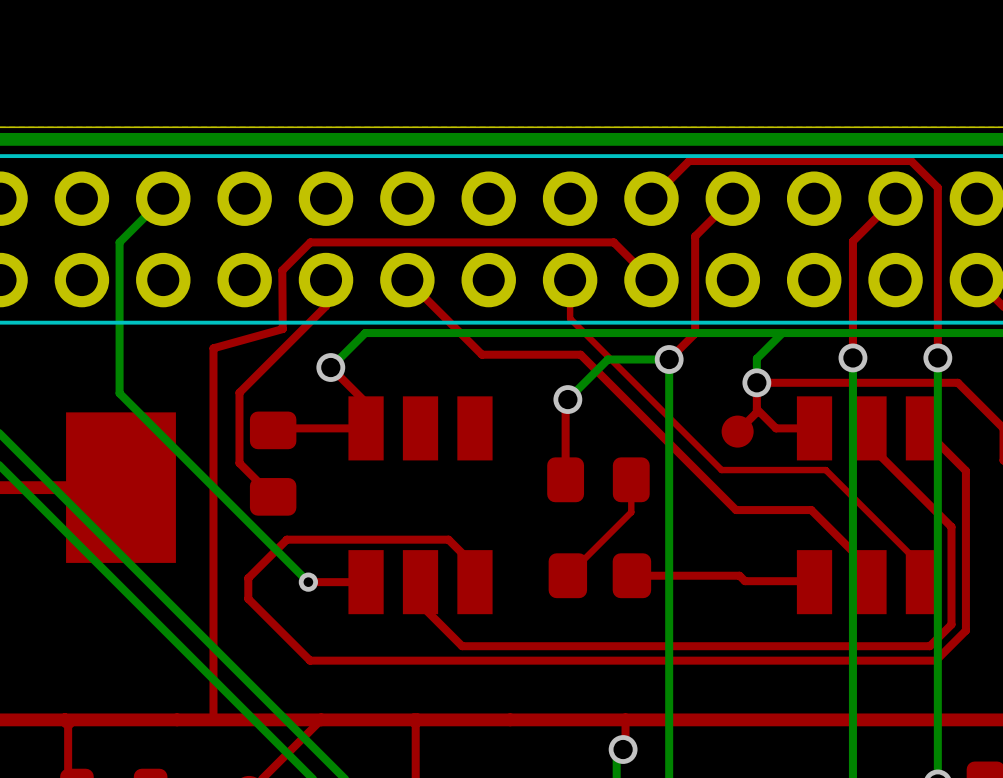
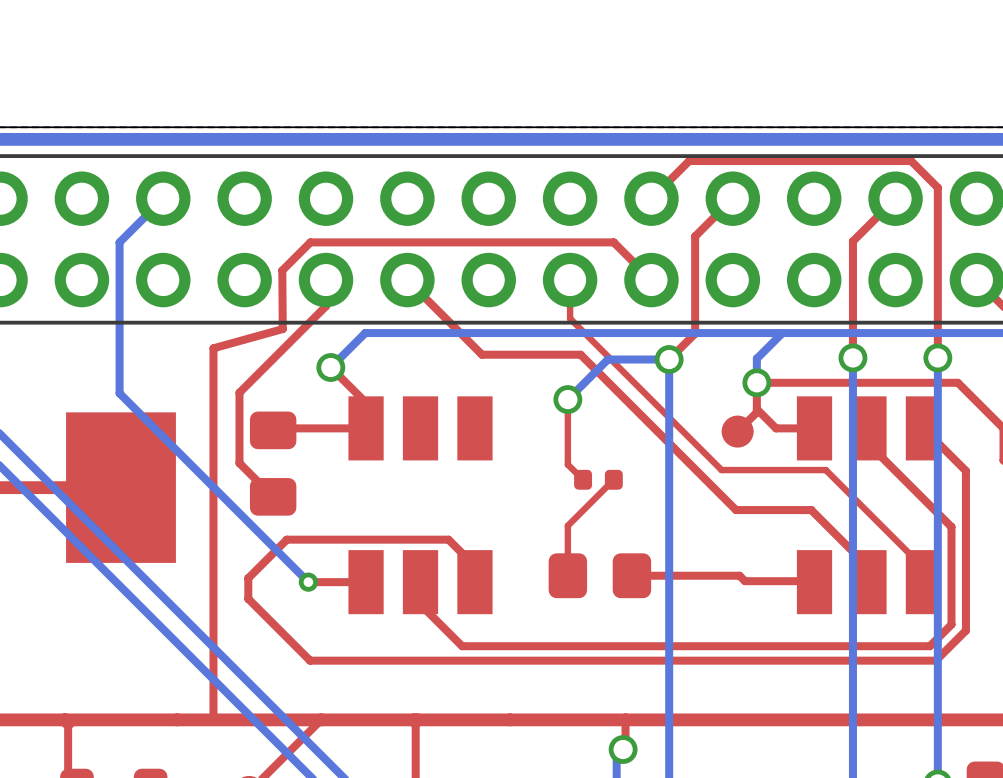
top track: none -> (567, 399) (567, 464) (583, 479)
top track: (565, 401) (565, 479) -> none
part footprint: [547, 457, 650, 503] -> [574, 469, 623, 490]
top track: (631, 479) (631, 512) (567, 575) -> (613, 479) (567, 525) (567, 575)

